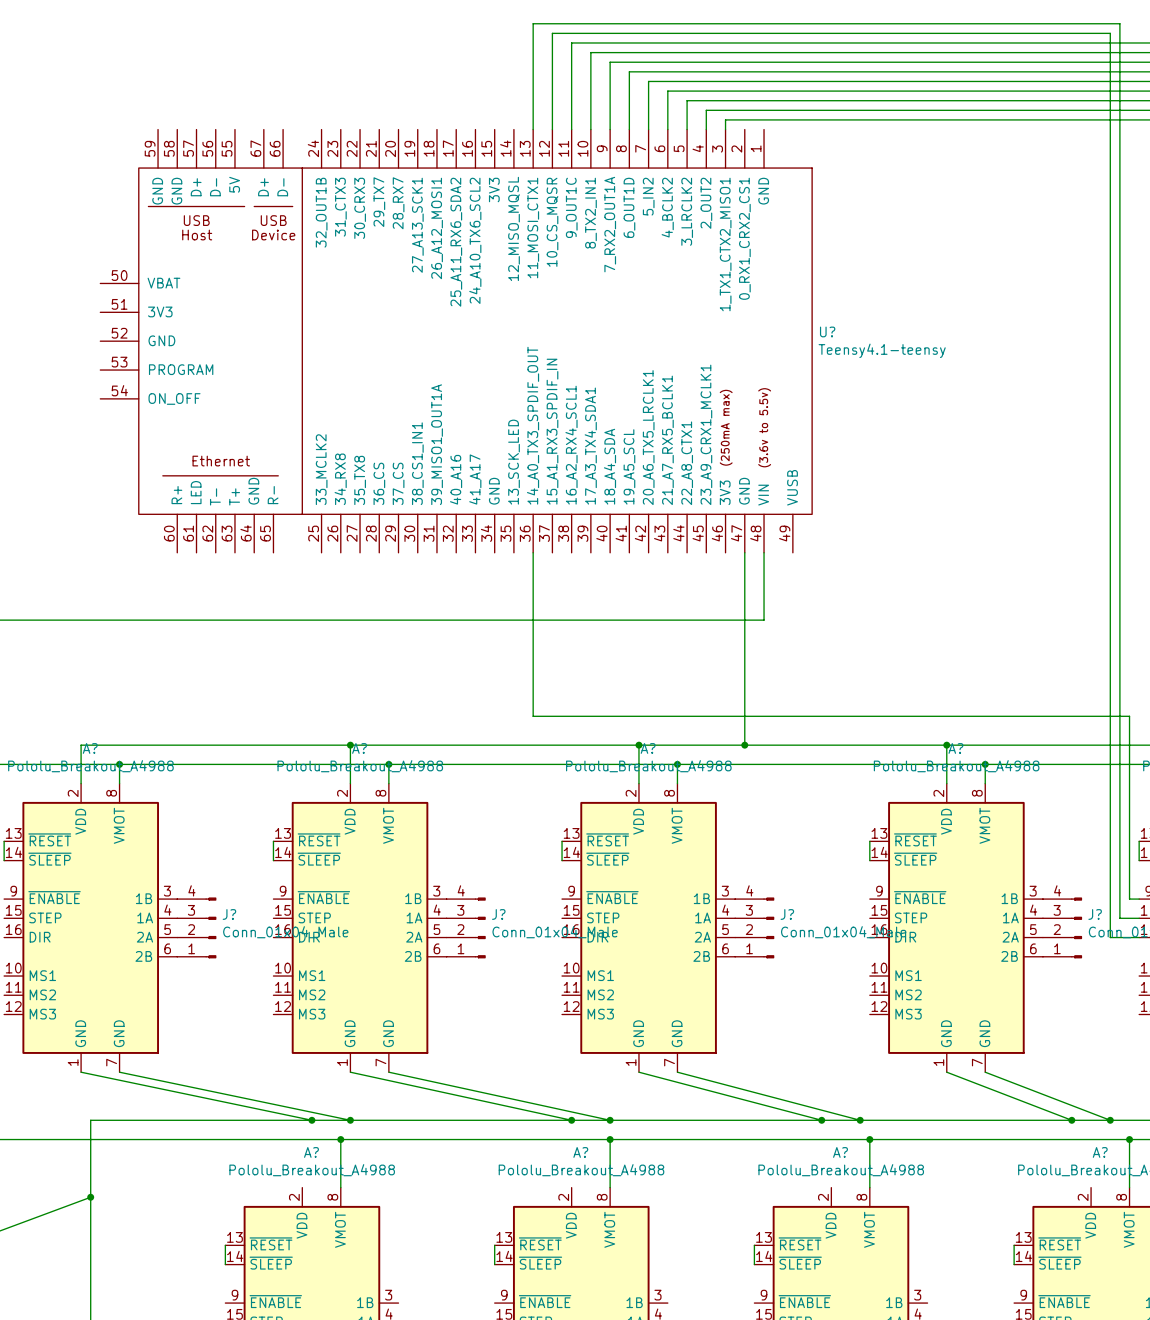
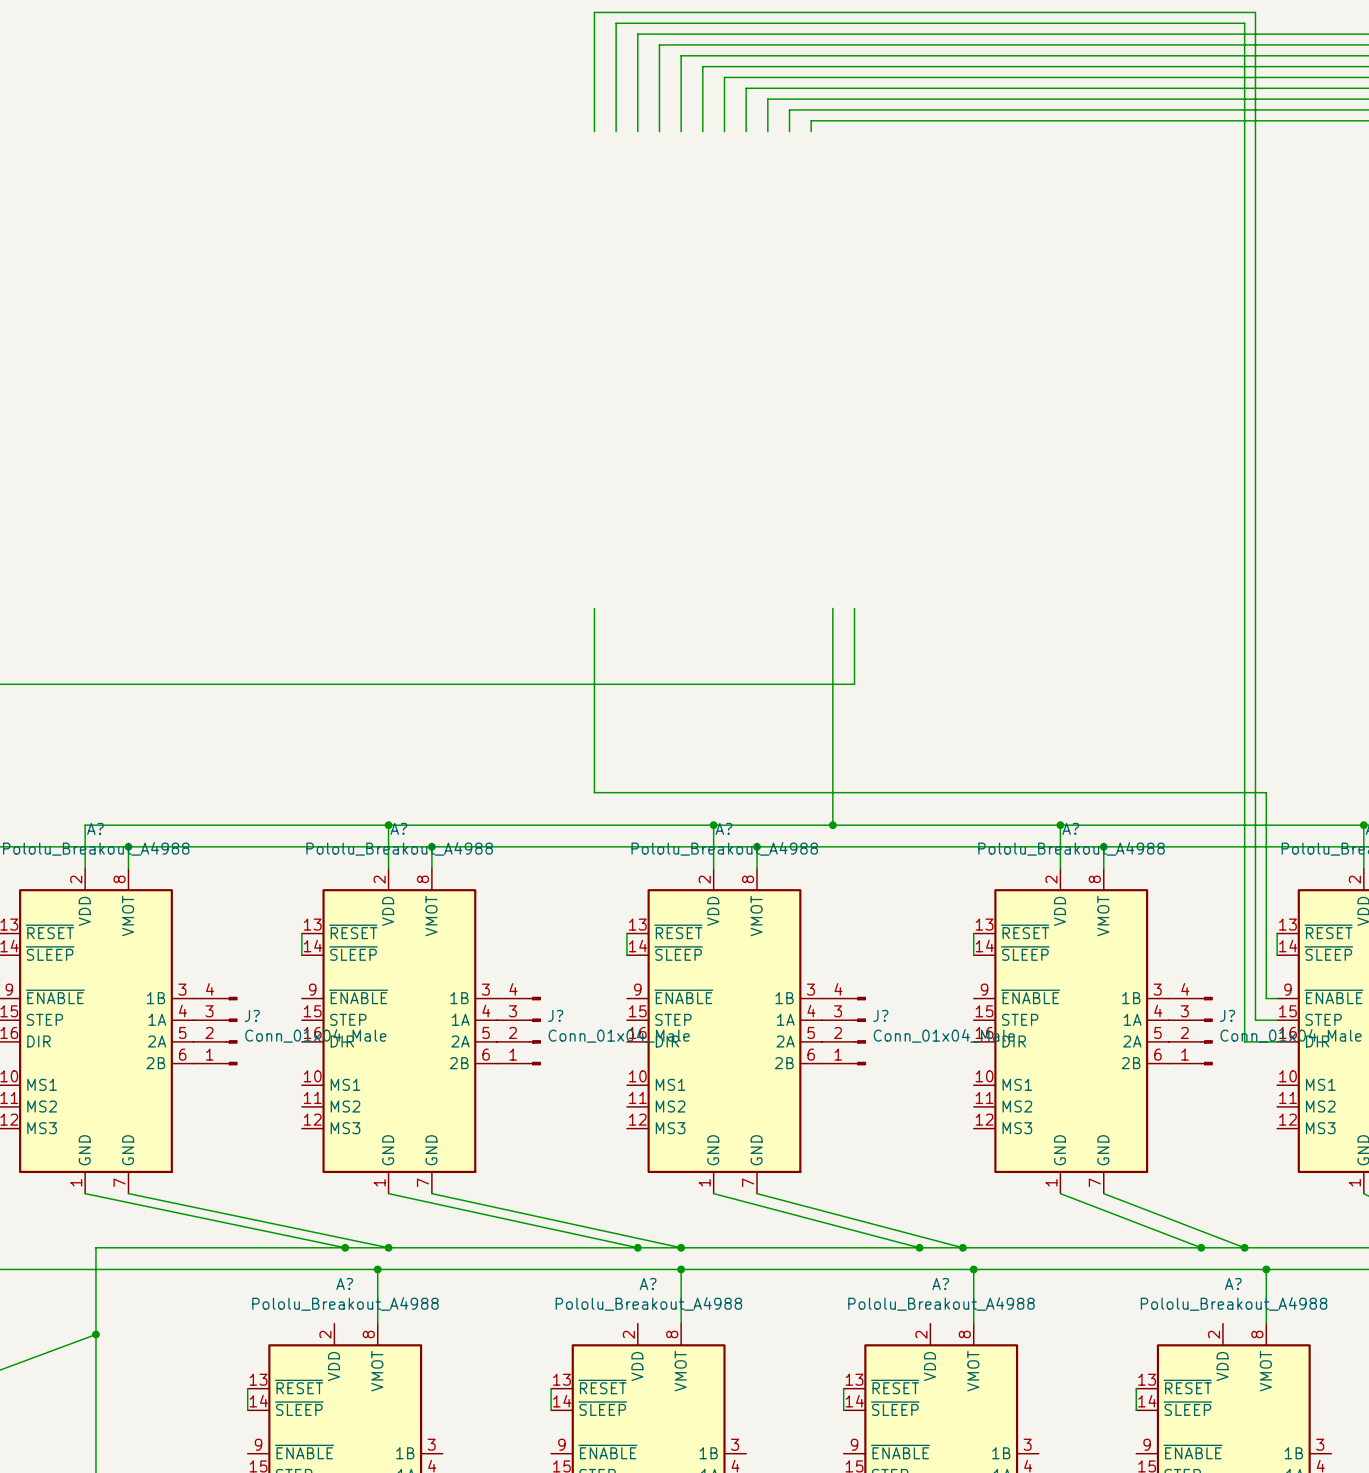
U?: Teensy4.1-teensy (456, 341) -> none

